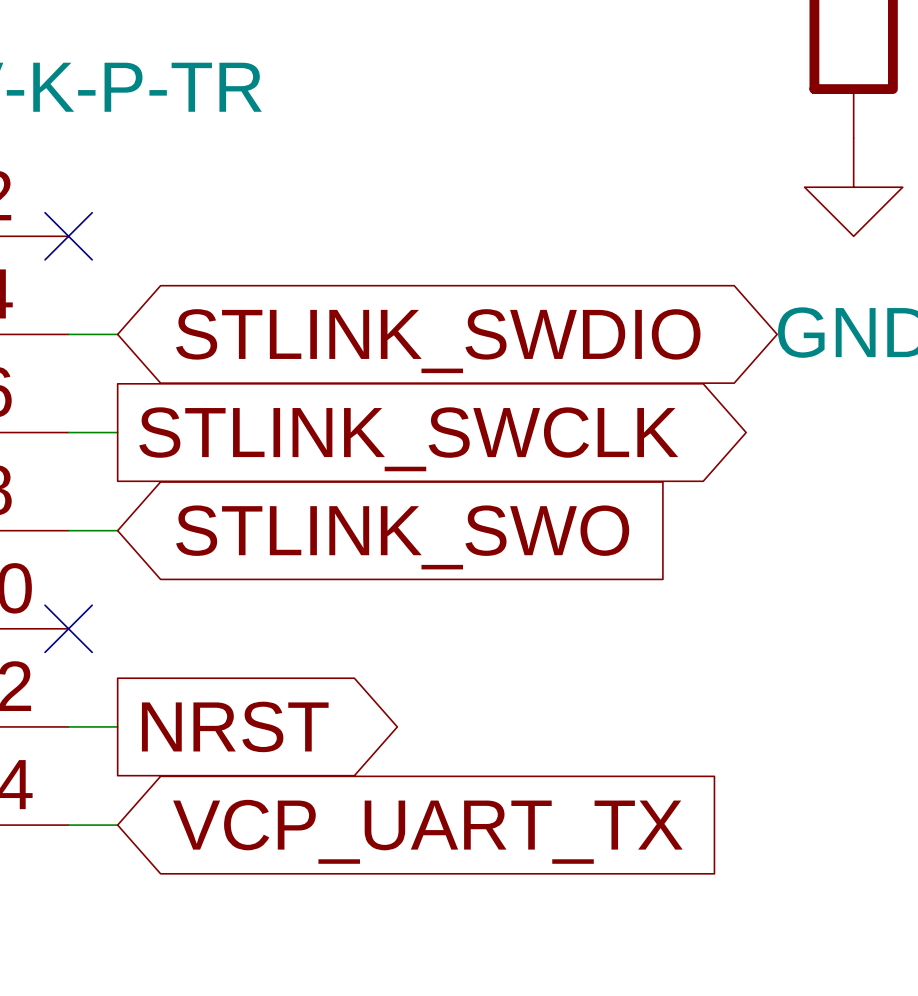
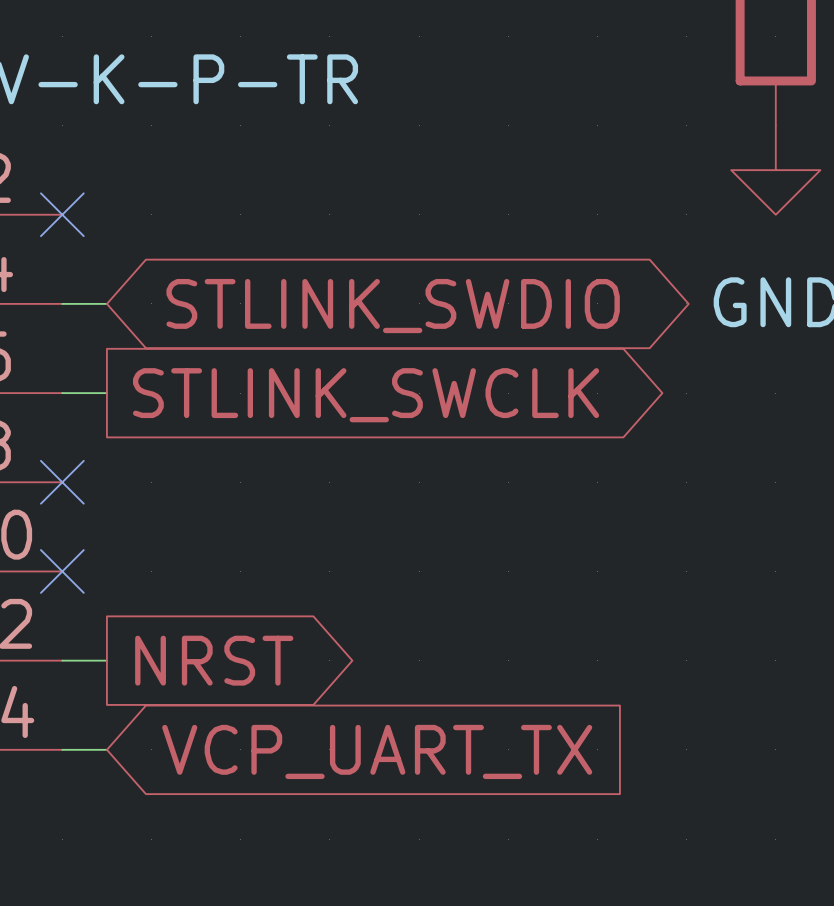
wire: (68, 530) (117, 530) -> none
no-connect mark: none -> (62, 482)
global label: STLINK_SWO (402, 537) -> none

